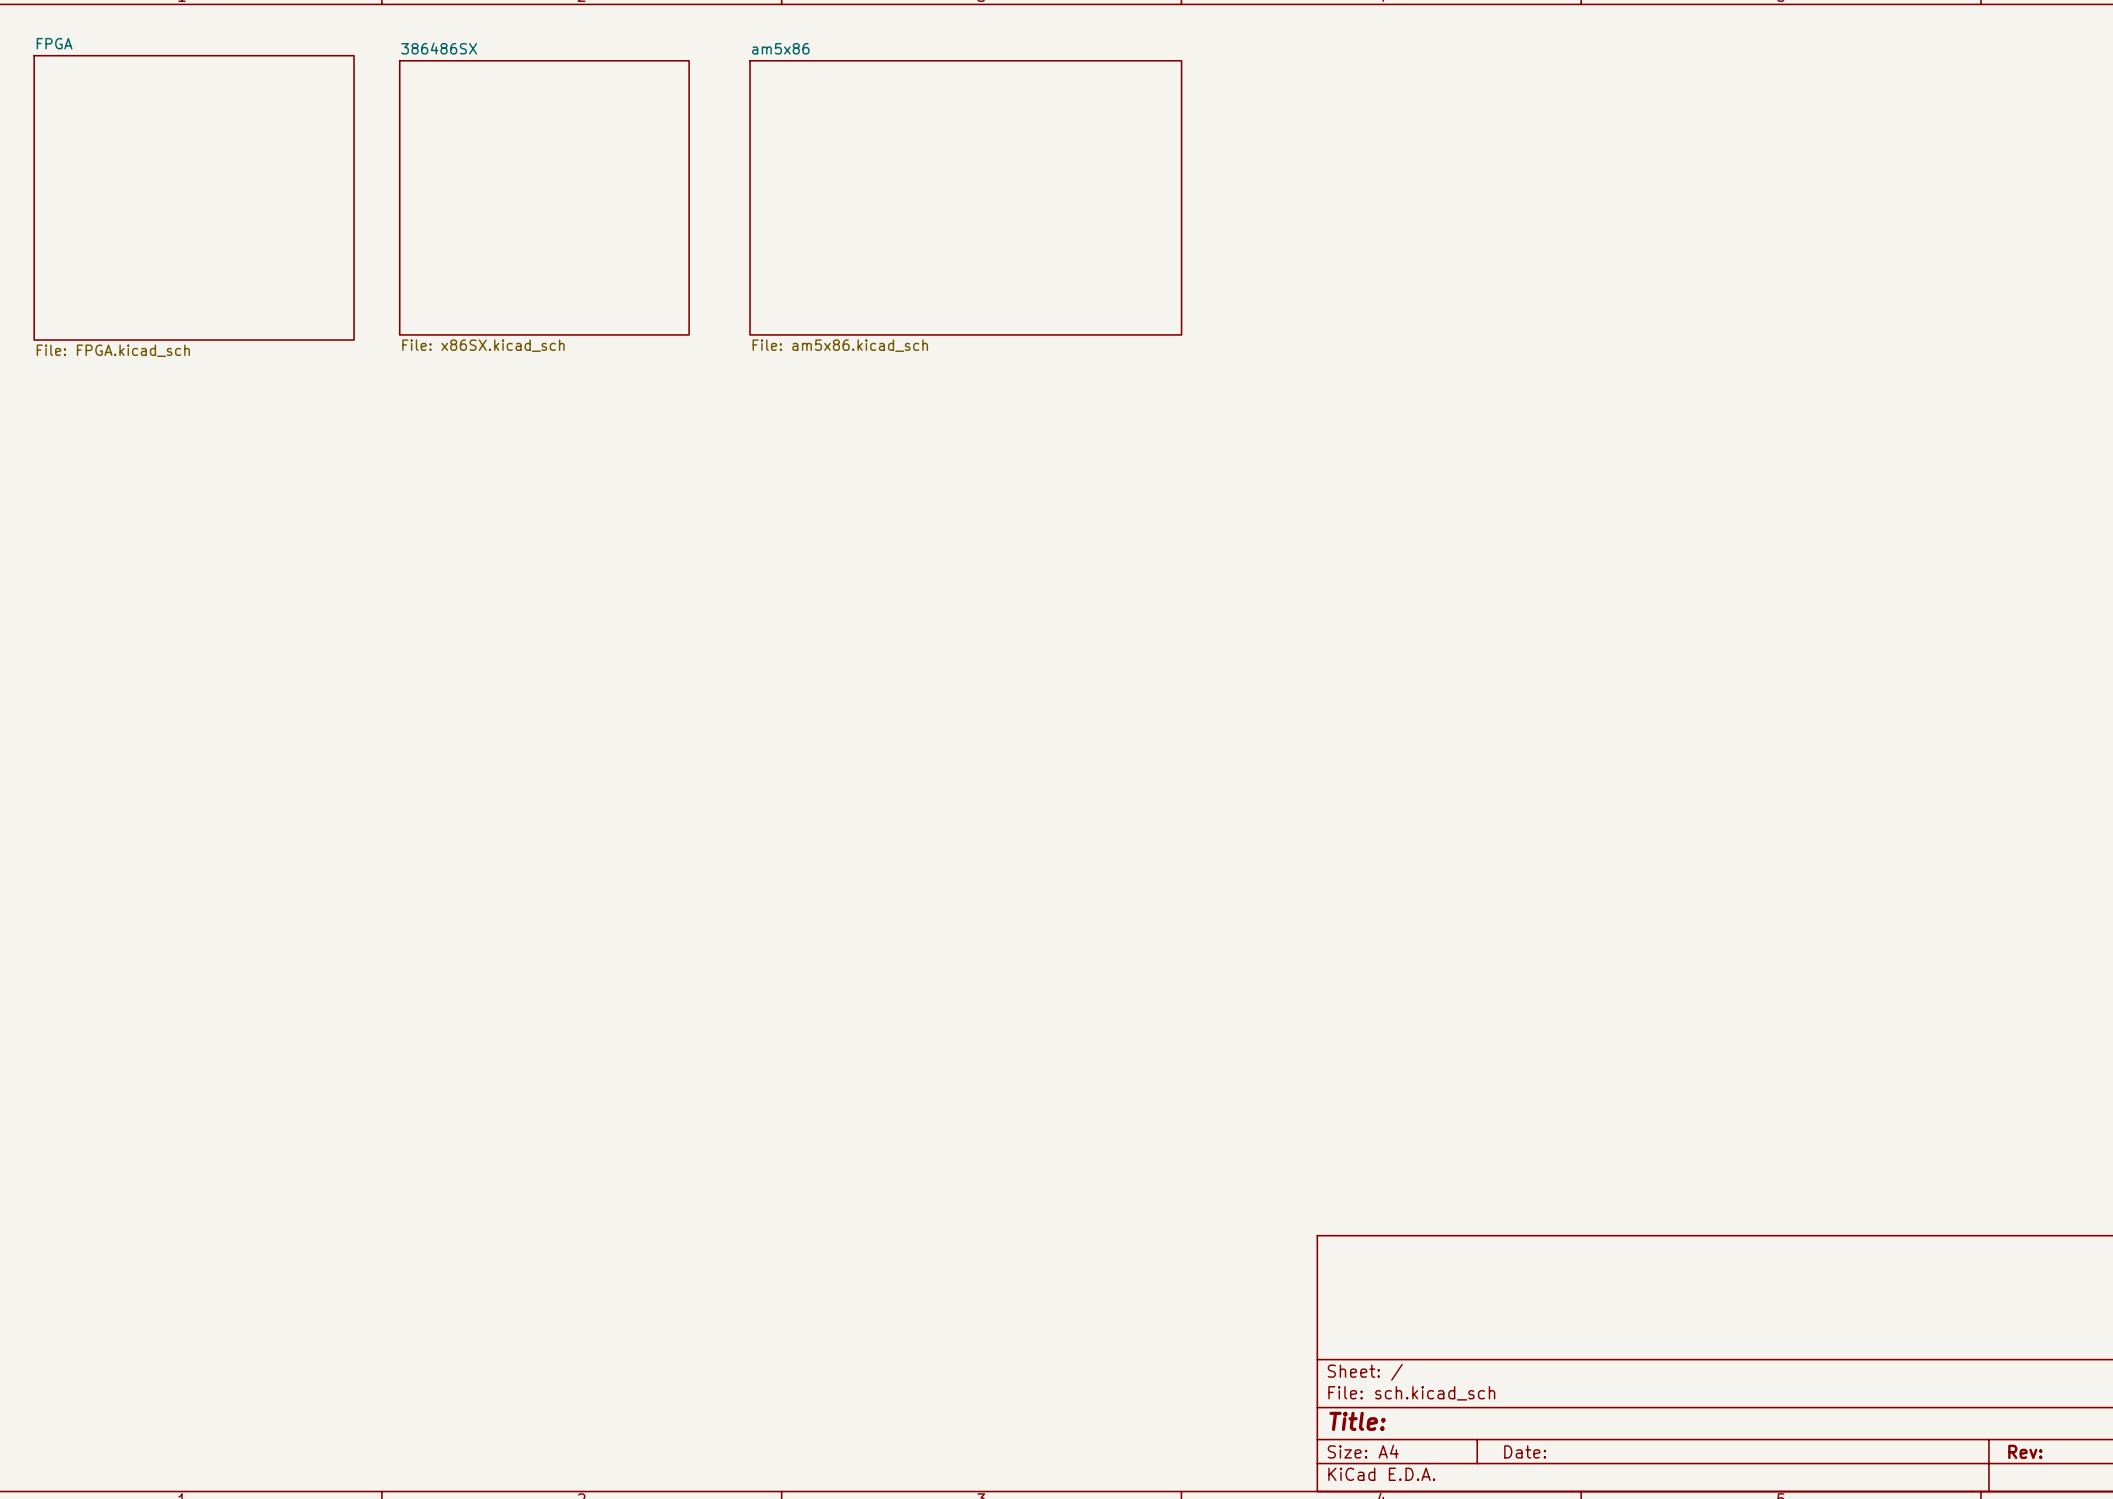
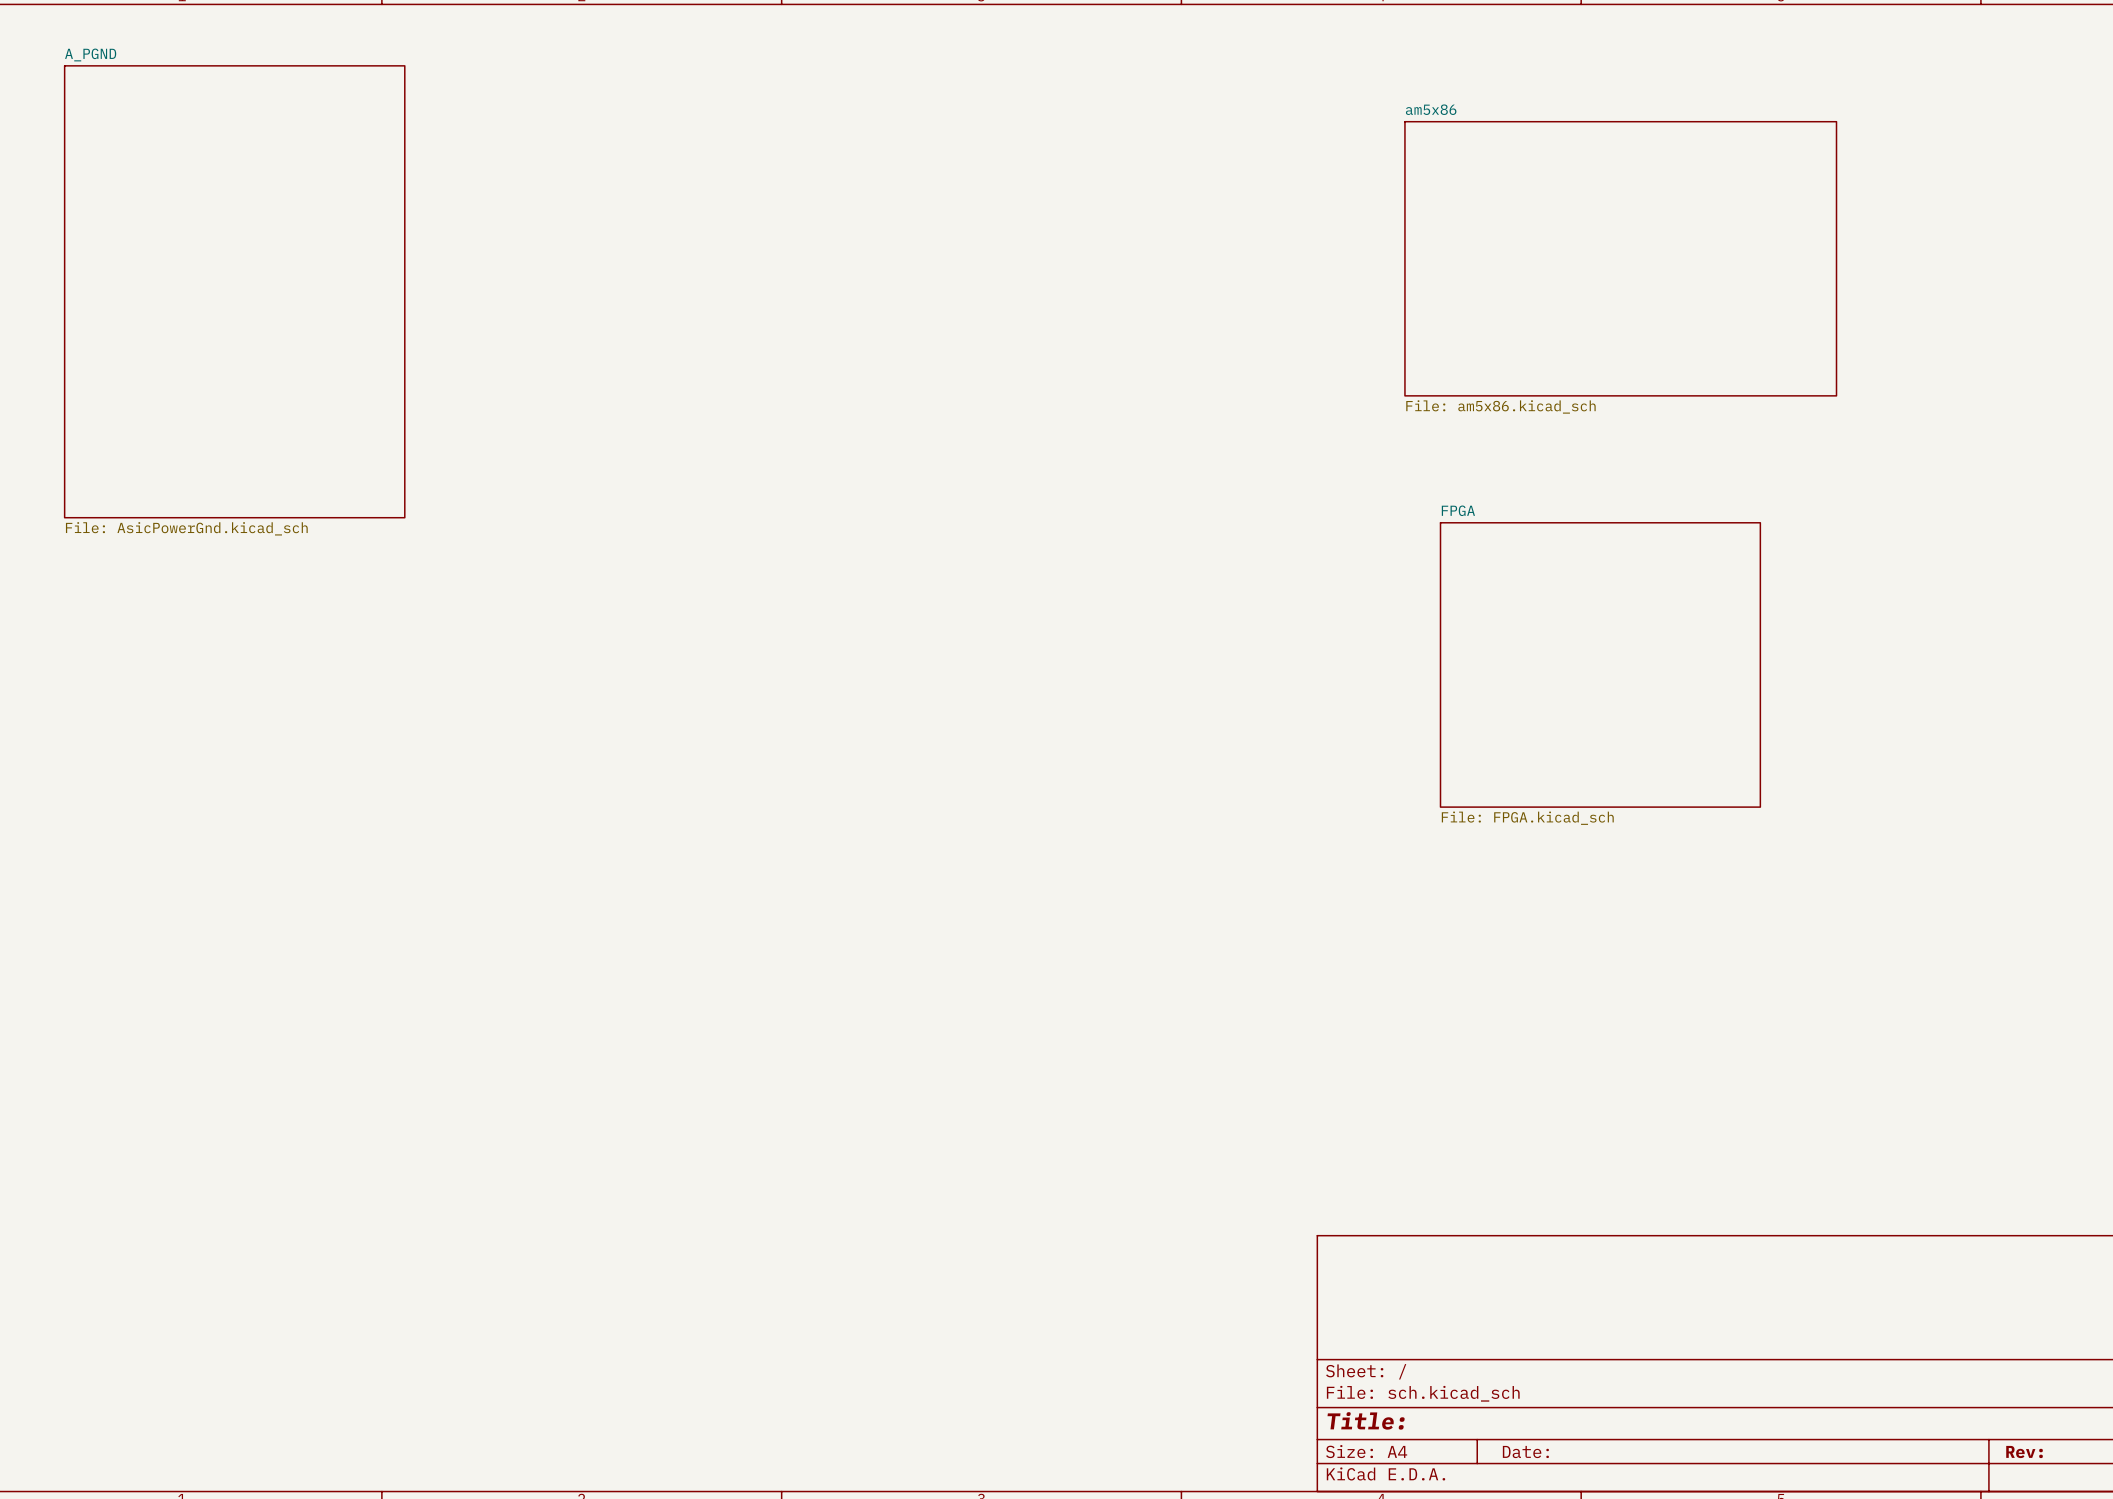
sheet FPGA: File: FPGA.kicad_sch (194, 197) -> none
sheet 386486SX: File: x86SX.kicad_sch (544, 197) -> none
sheet am5x86 position: (965, 197) -> (1620, 258)
sheet A_PGND: none -> File: AsicPowerGnd.kicad_sch (234, 291)
sheet FPGA: none -> File: FPGA.kicad_sch (1600, 664)

